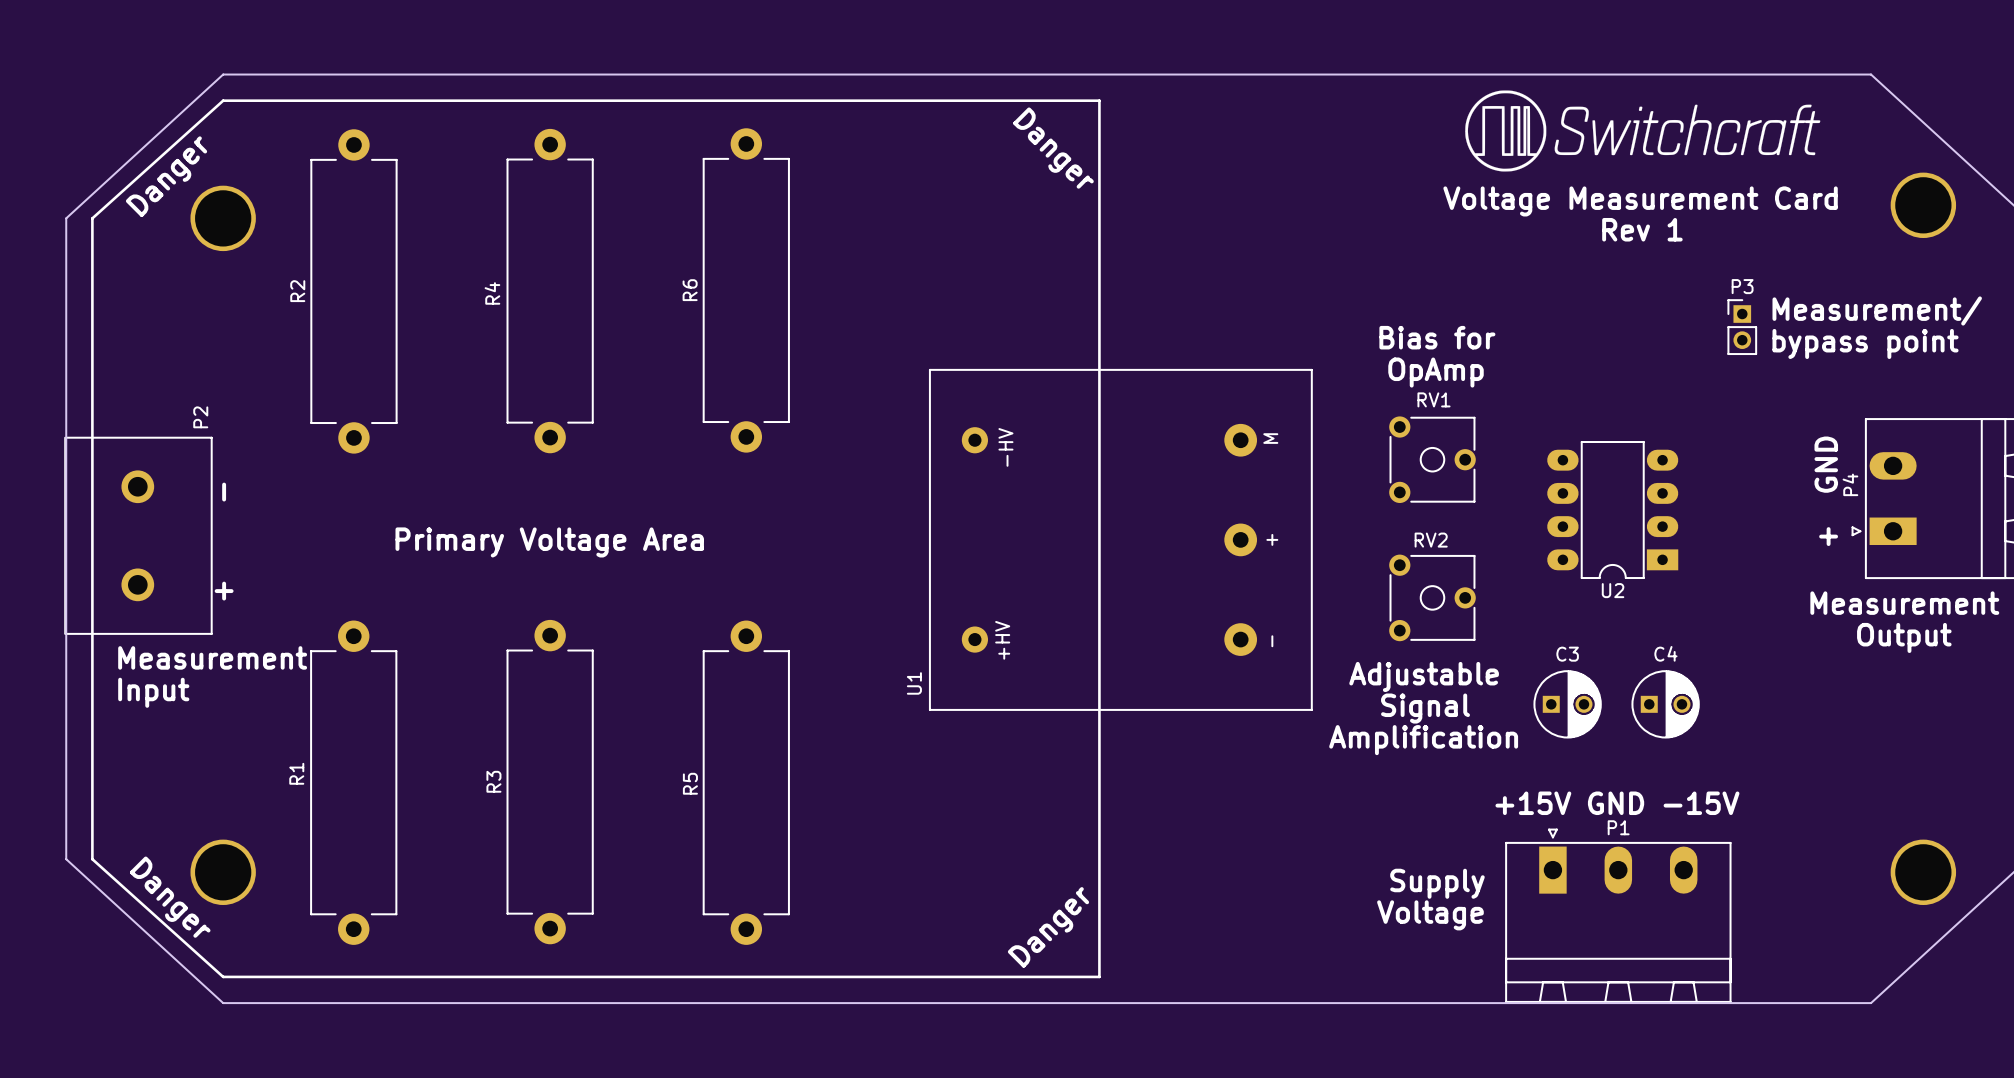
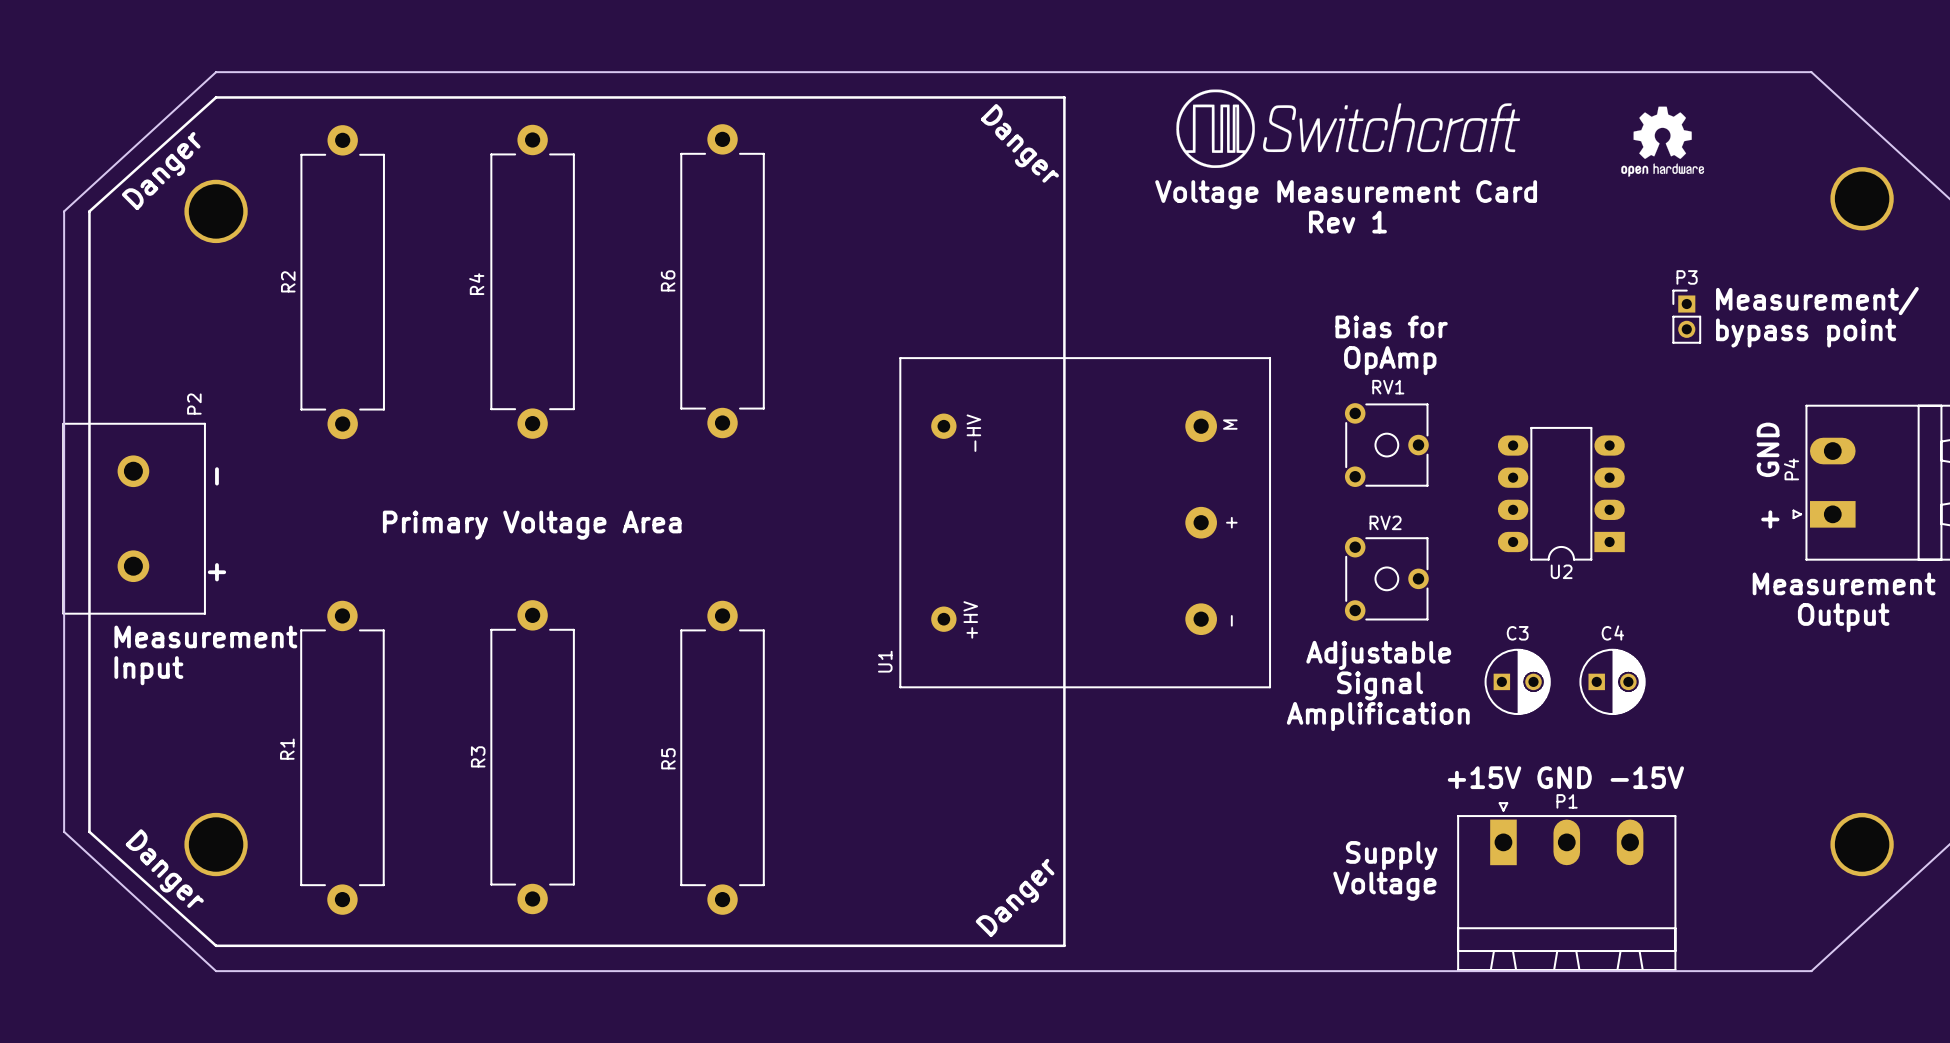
drawing: none -> [1621, 106, 1705, 177]
drawing position: (1642, 130) -> (1348, 128)
text position: Voltage Measurement Card (1640, 201) -> Voltage Measurement Card (1346, 194)
text position: Rev 1 (1642, 229) -> Rev 1 (1347, 222)

